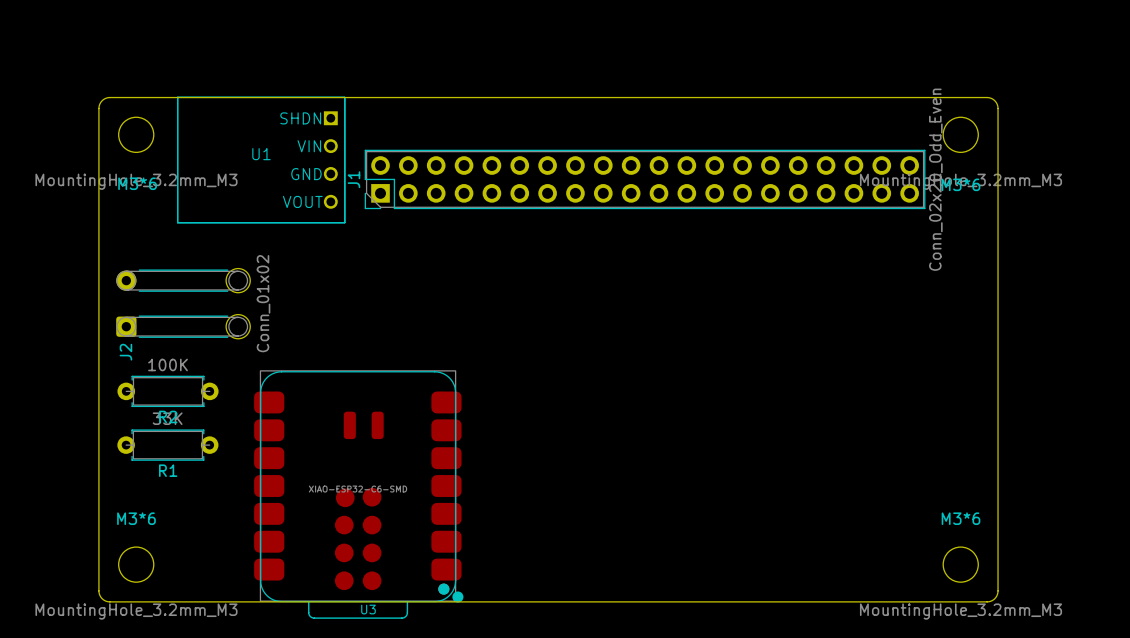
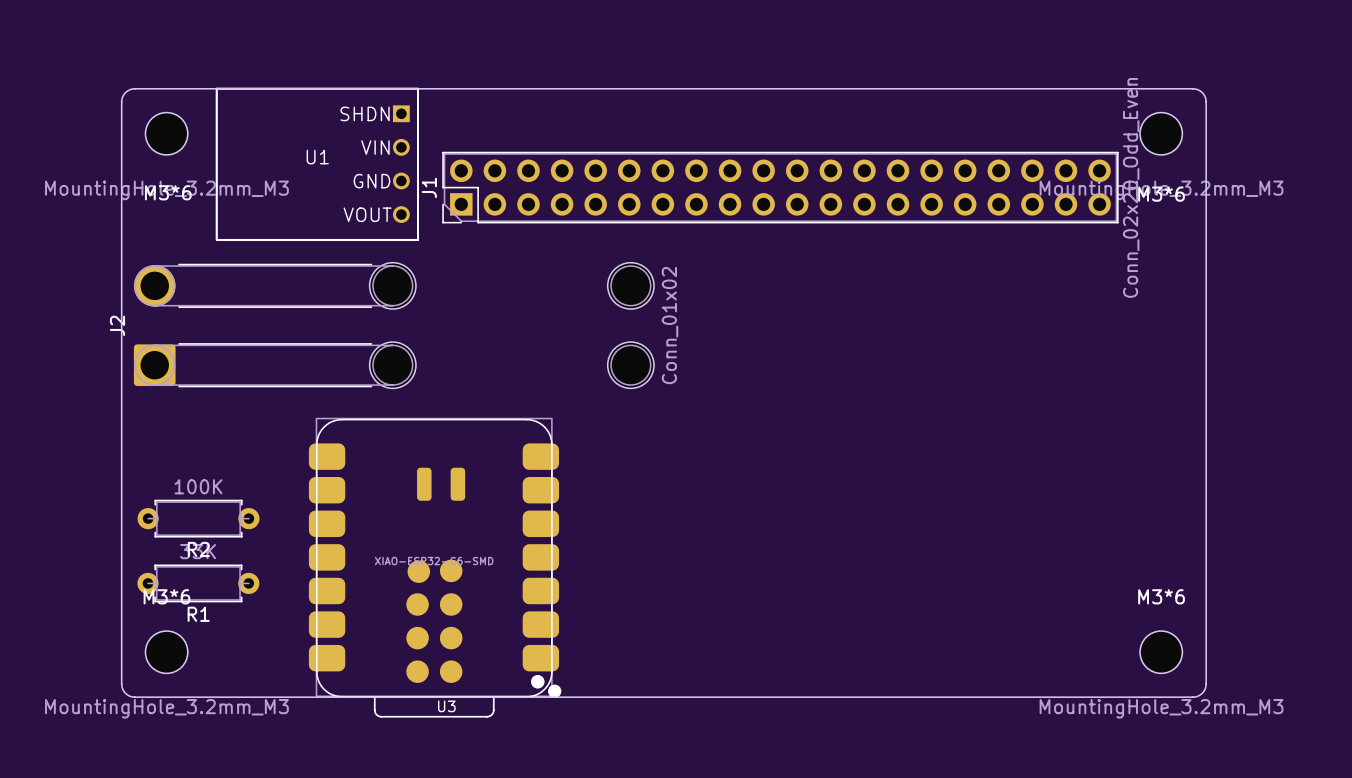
J2 footprint: [116, 268, 251, 339] -> [133, 262, 655, 389]
J2 value position: Conn_01x02 (263, 303) -> Conn_01x02 (670, 325)
J2 name position: J2 (125, 352) -> J2 (117, 325)
R2 position: (168, 391) -> (198, 518)
R1 position: (167, 445) -> (198, 583)

